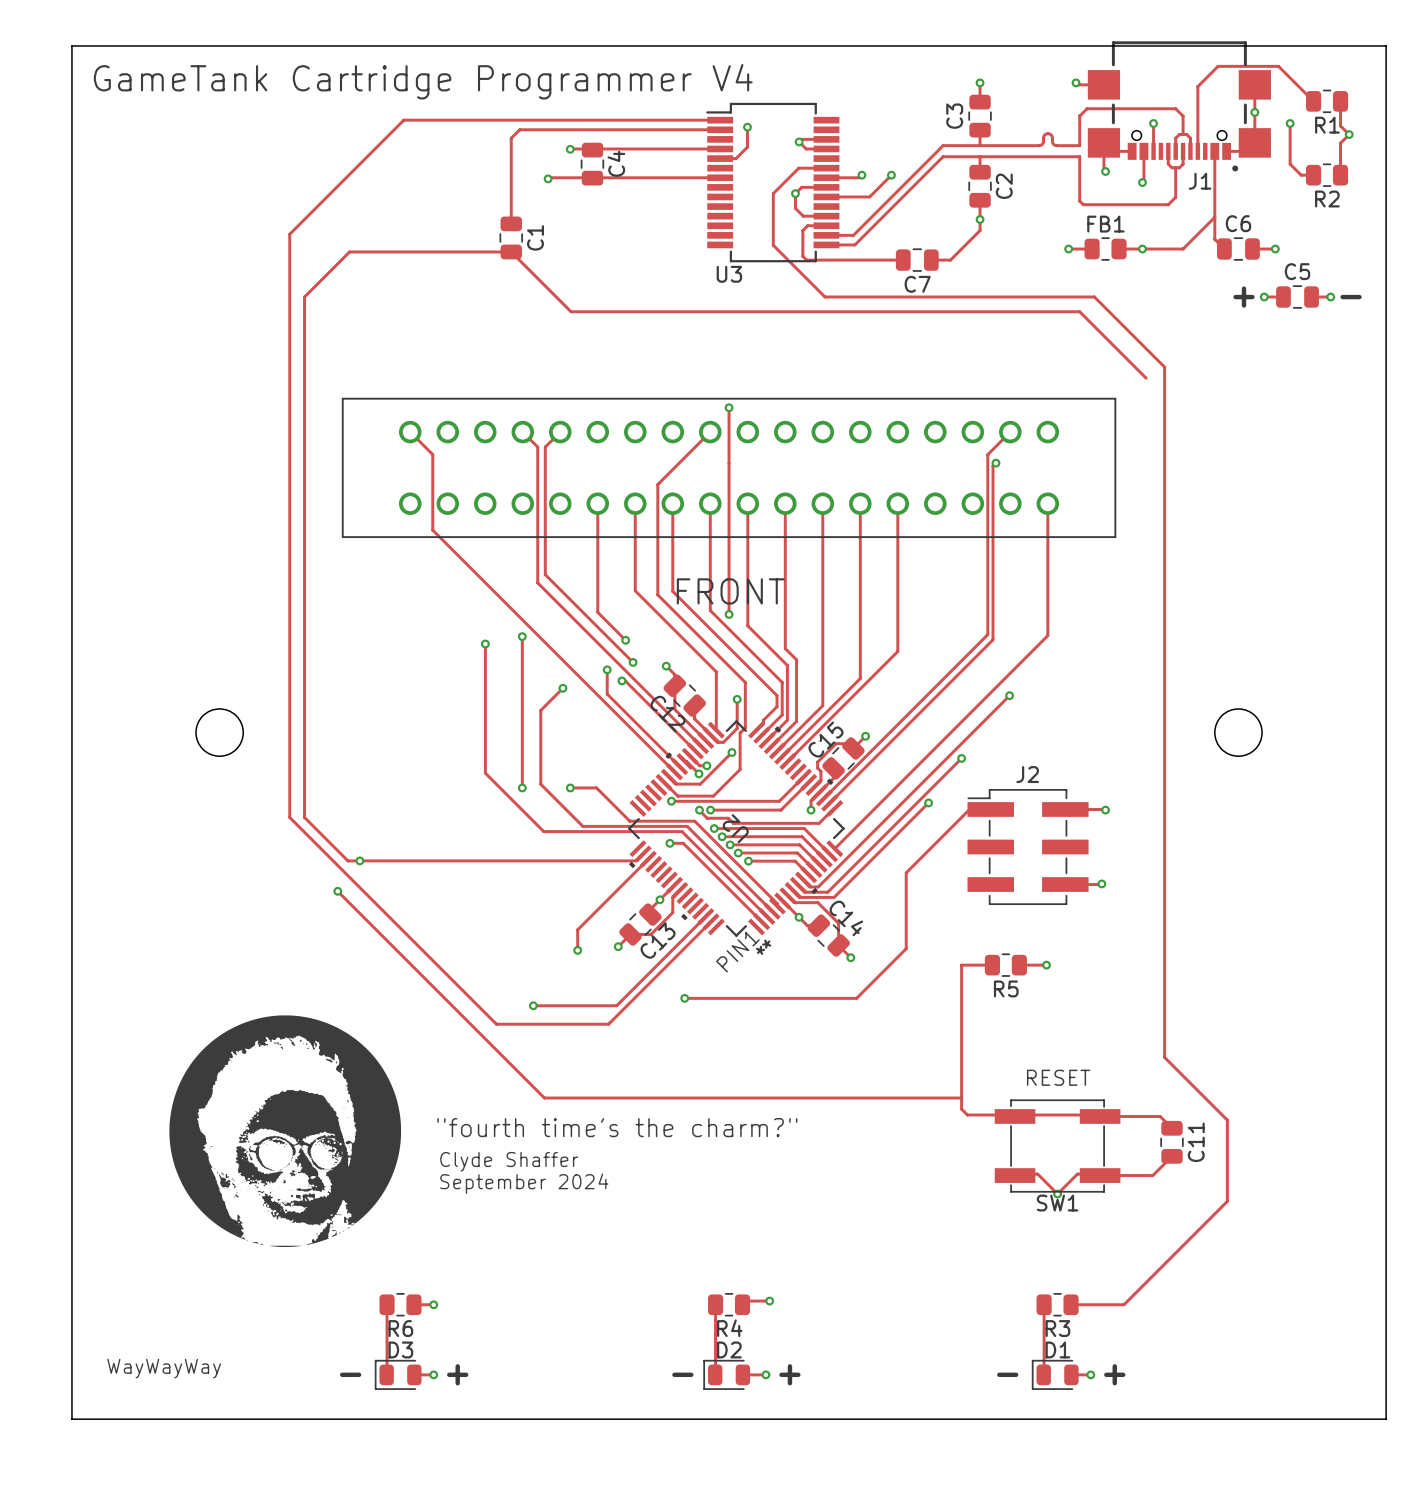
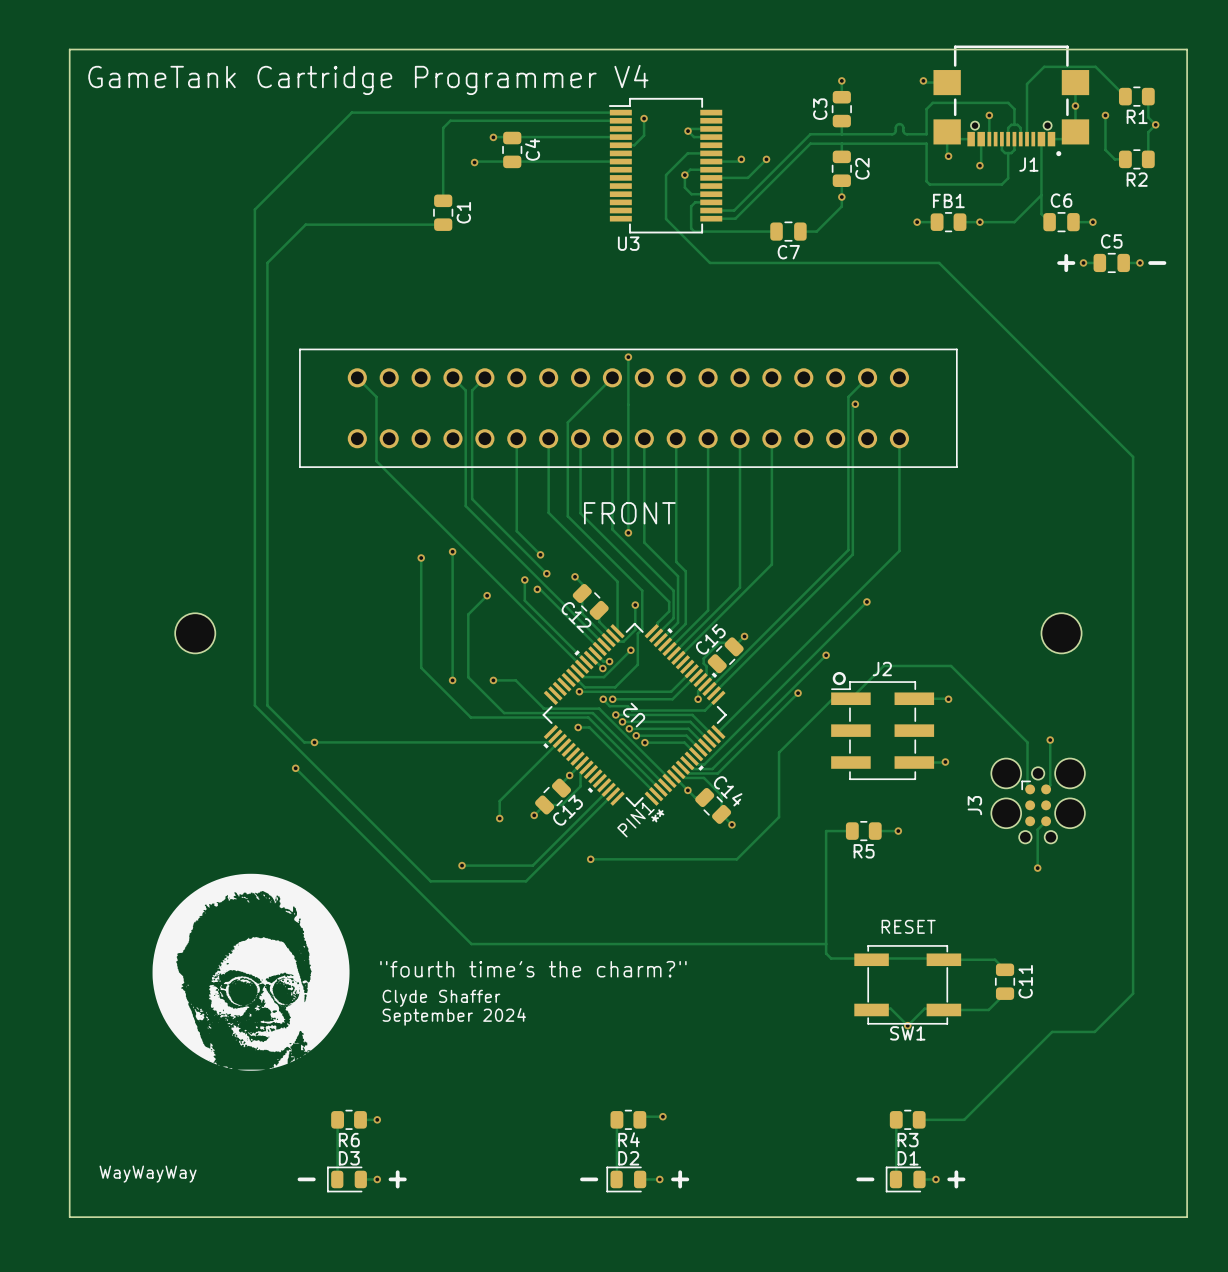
track: (511, 251) (571, 311) (1079, 311) (1146, 378) -> none
track: (1164, 367) (1164, 1057) (1227, 1120) (1227, 1201) -> (998, 322) (1133, 456) (1133, 993) (1094, 1031) (1052, 1031)
drawing: none -> [832, 671, 846, 686]
track: none -> (850, 698) (883, 665) (951, 665) (1027, 742) (1027, 786) (1030, 789)
track: none -> (1050, 740) (1050, 785) (1046, 789)
via: none -> (1050, 740)
J3: none -> (1038, 800)
track: none -> (1046, 821) (1037, 829) (1037, 868)
via: none -> (1037, 868)

